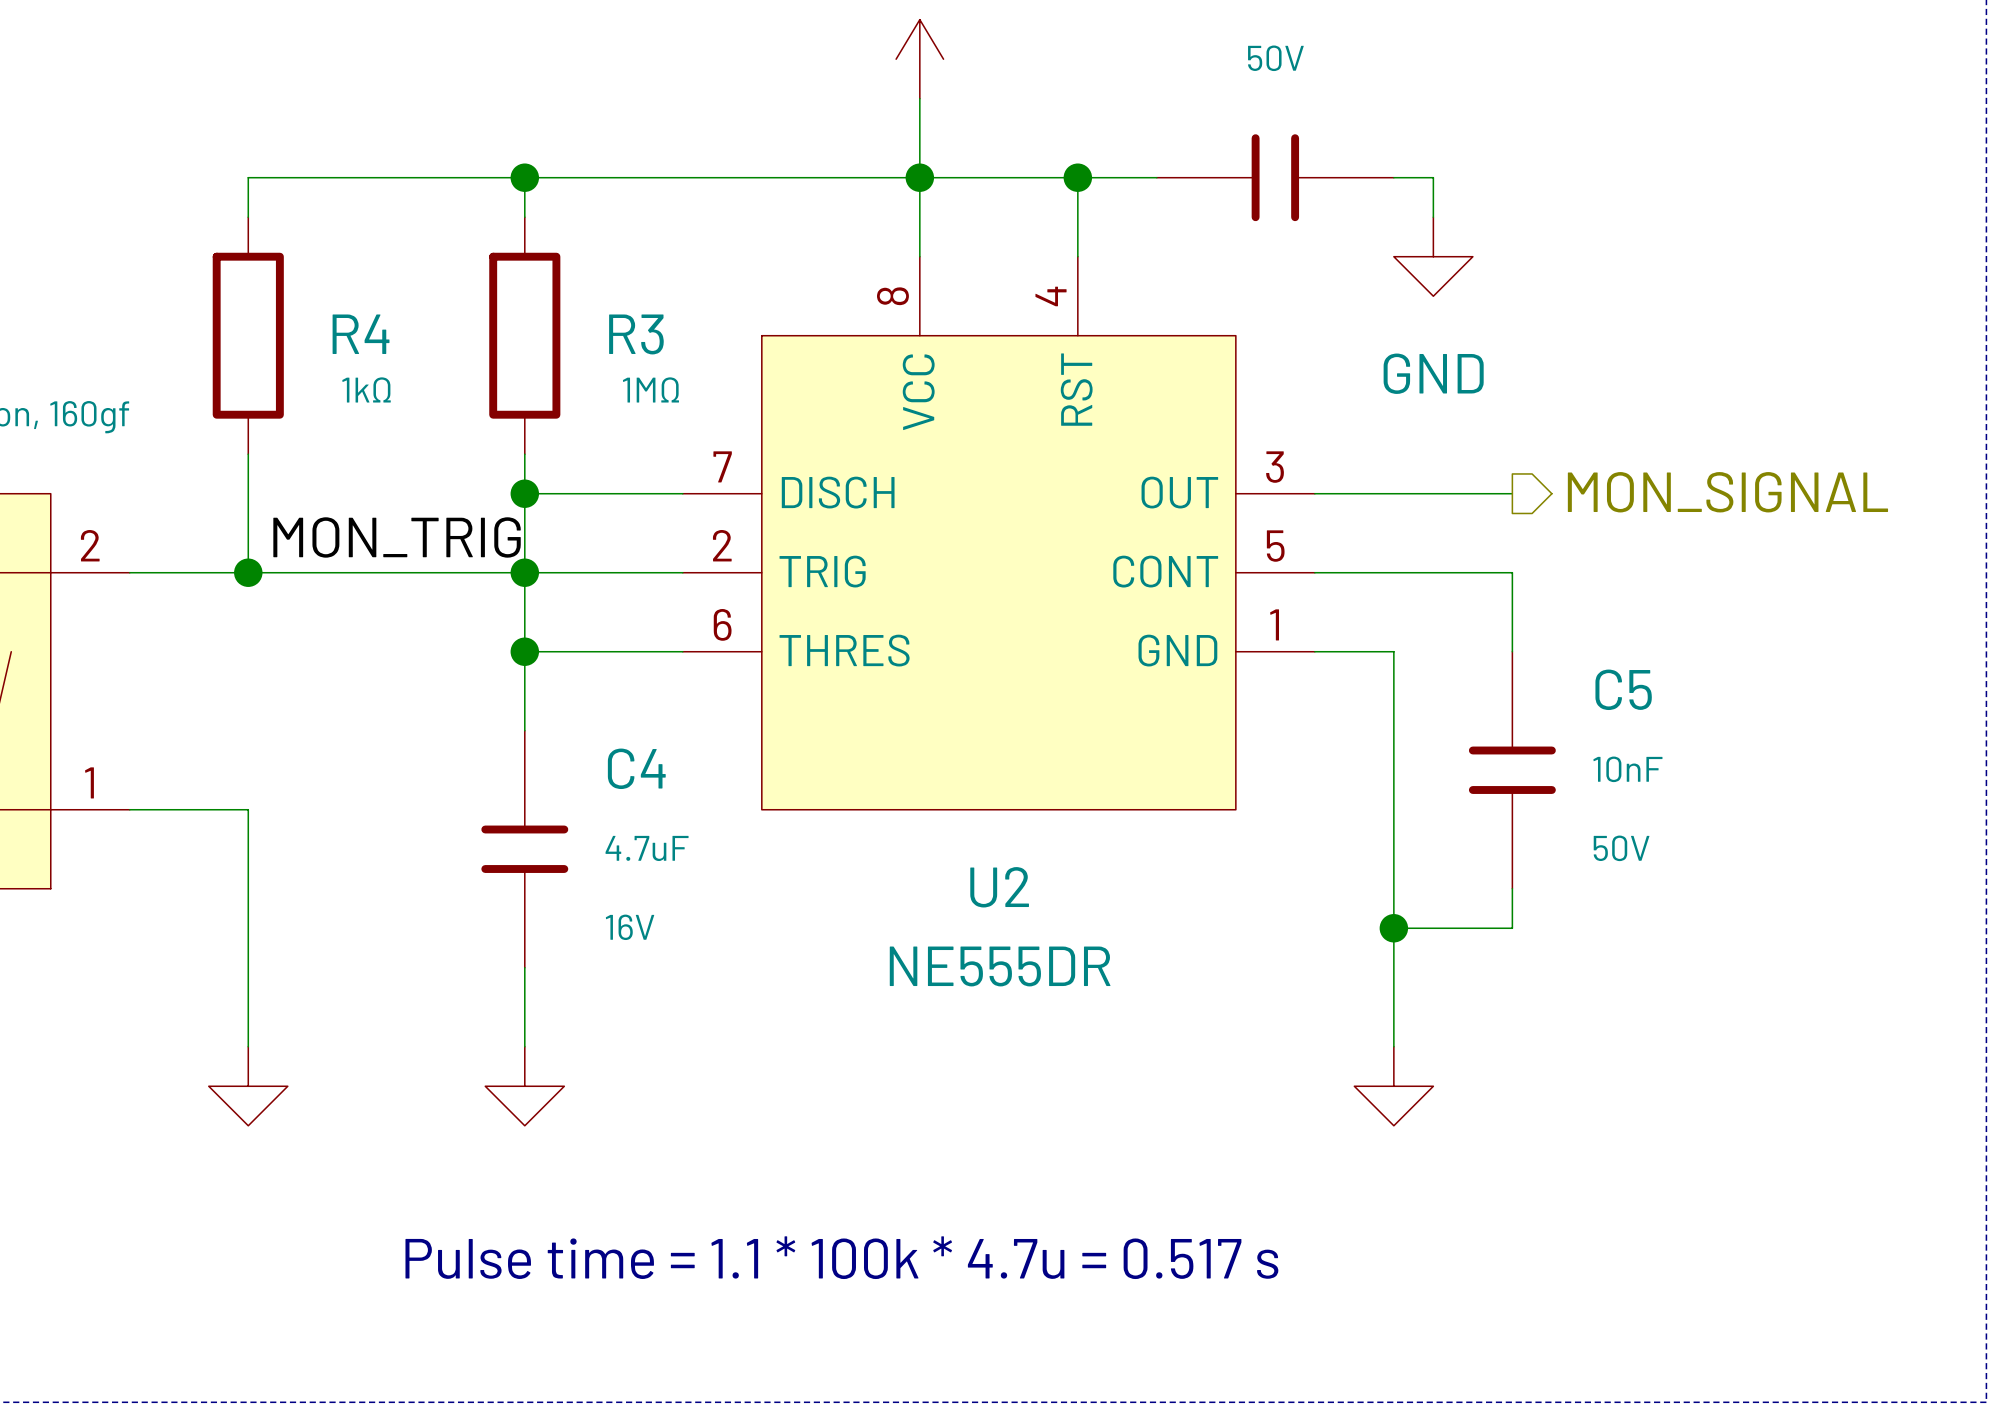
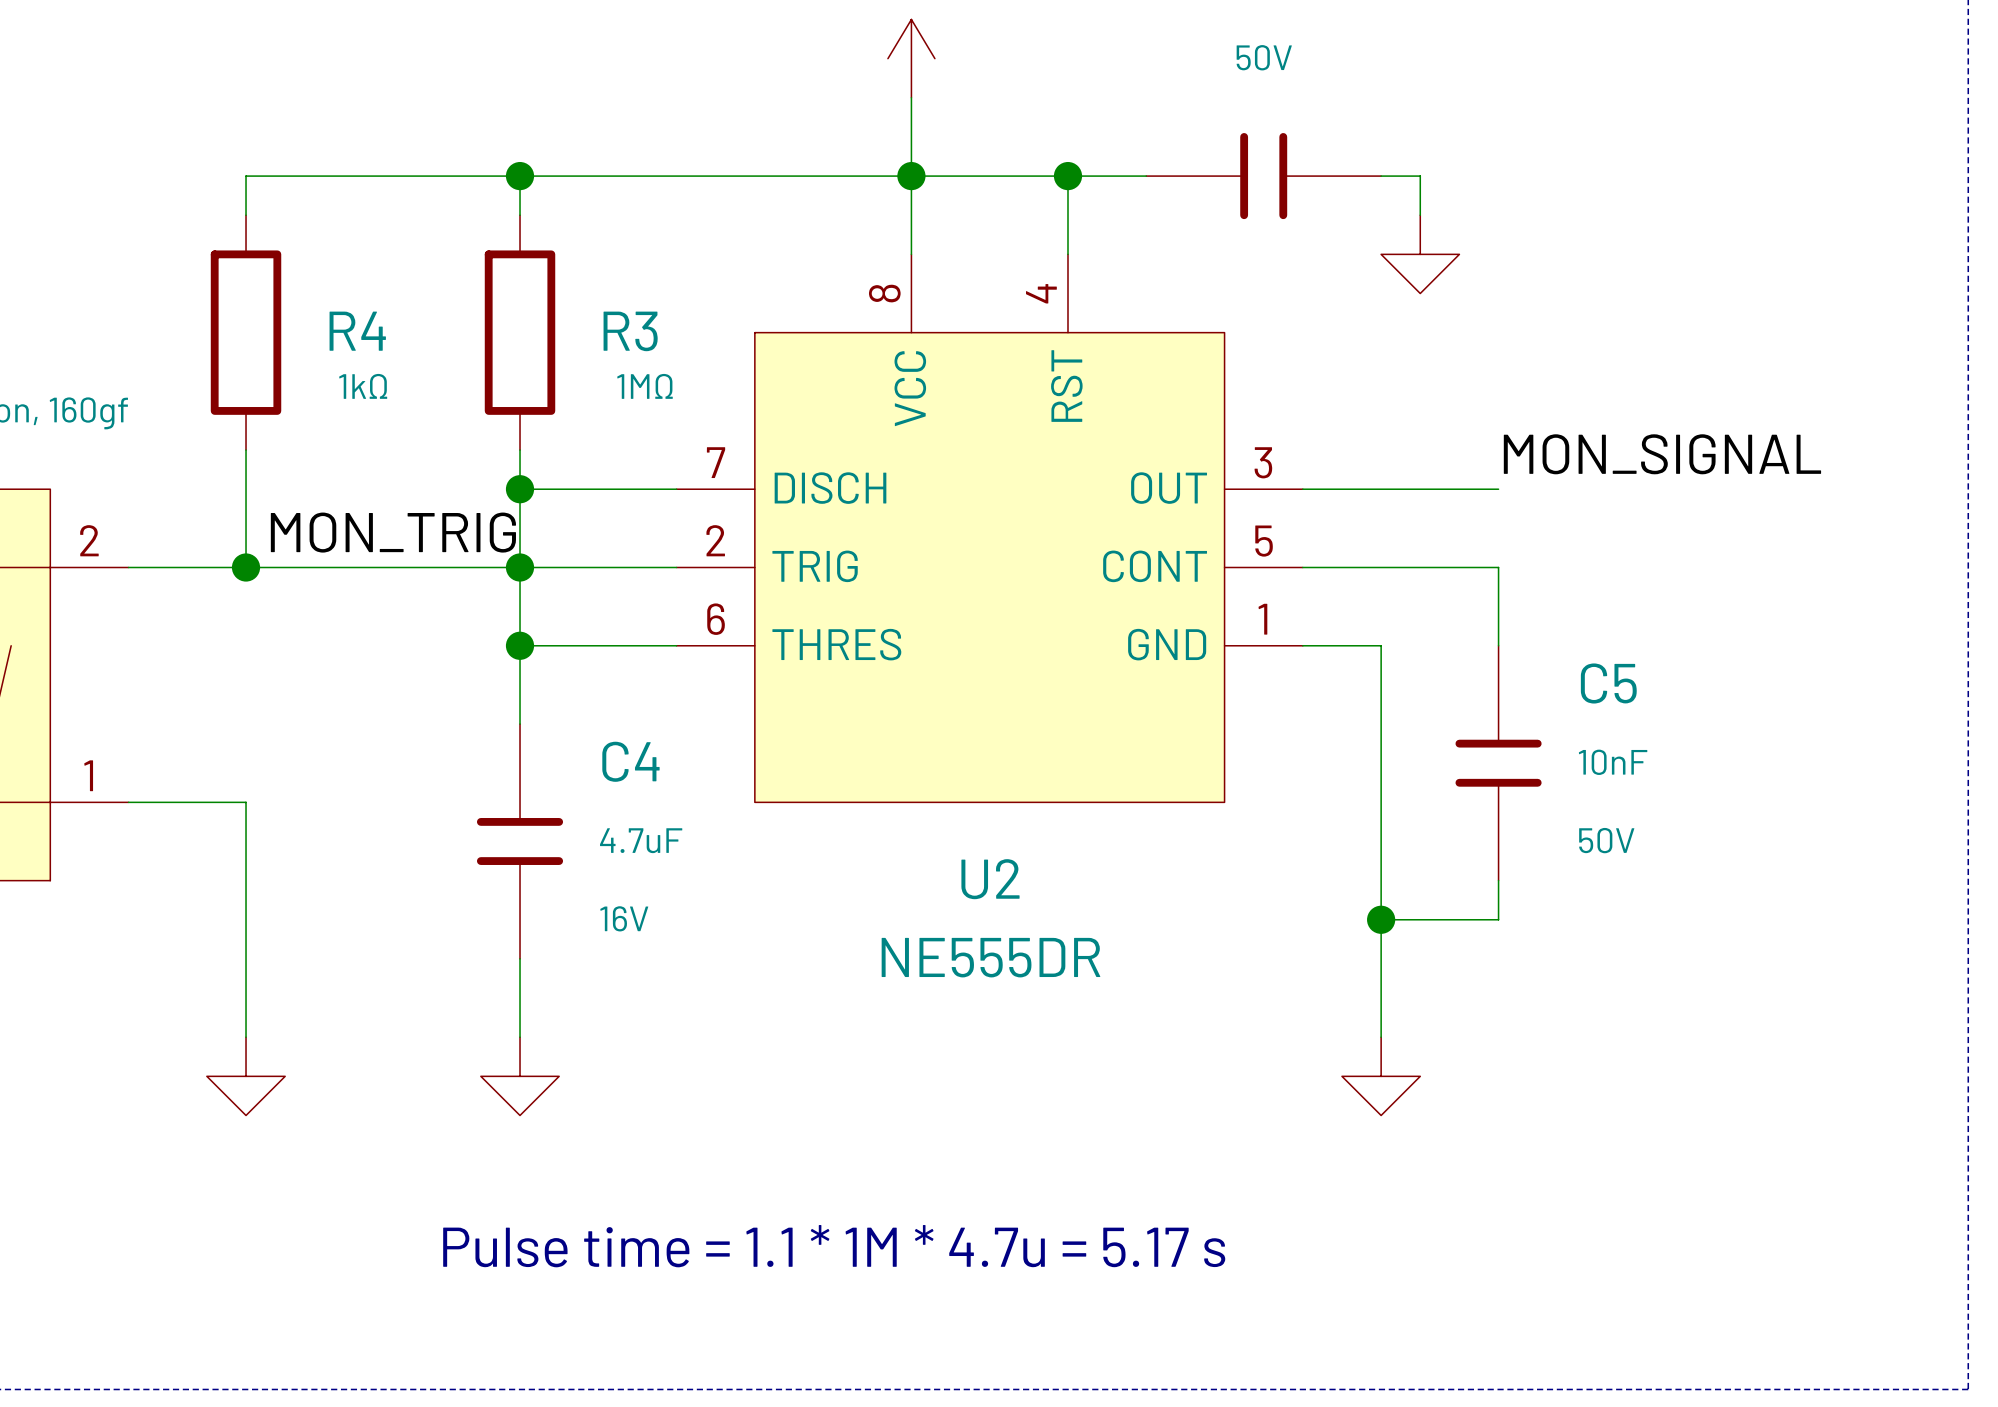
power symbol text: GND (1433, 373) -> none
label: none -> MON_SIGNAL (1662, 454)
hierarchical label: MON_SIGNAL (1727, 492) -> none
text: Pulse time = 1.1 * 100k * 4.7u = 0.517 s (841, 1257) -> Pulse time = 1.1 * 1M * 4.7u = 5.17 s (834, 1246)

